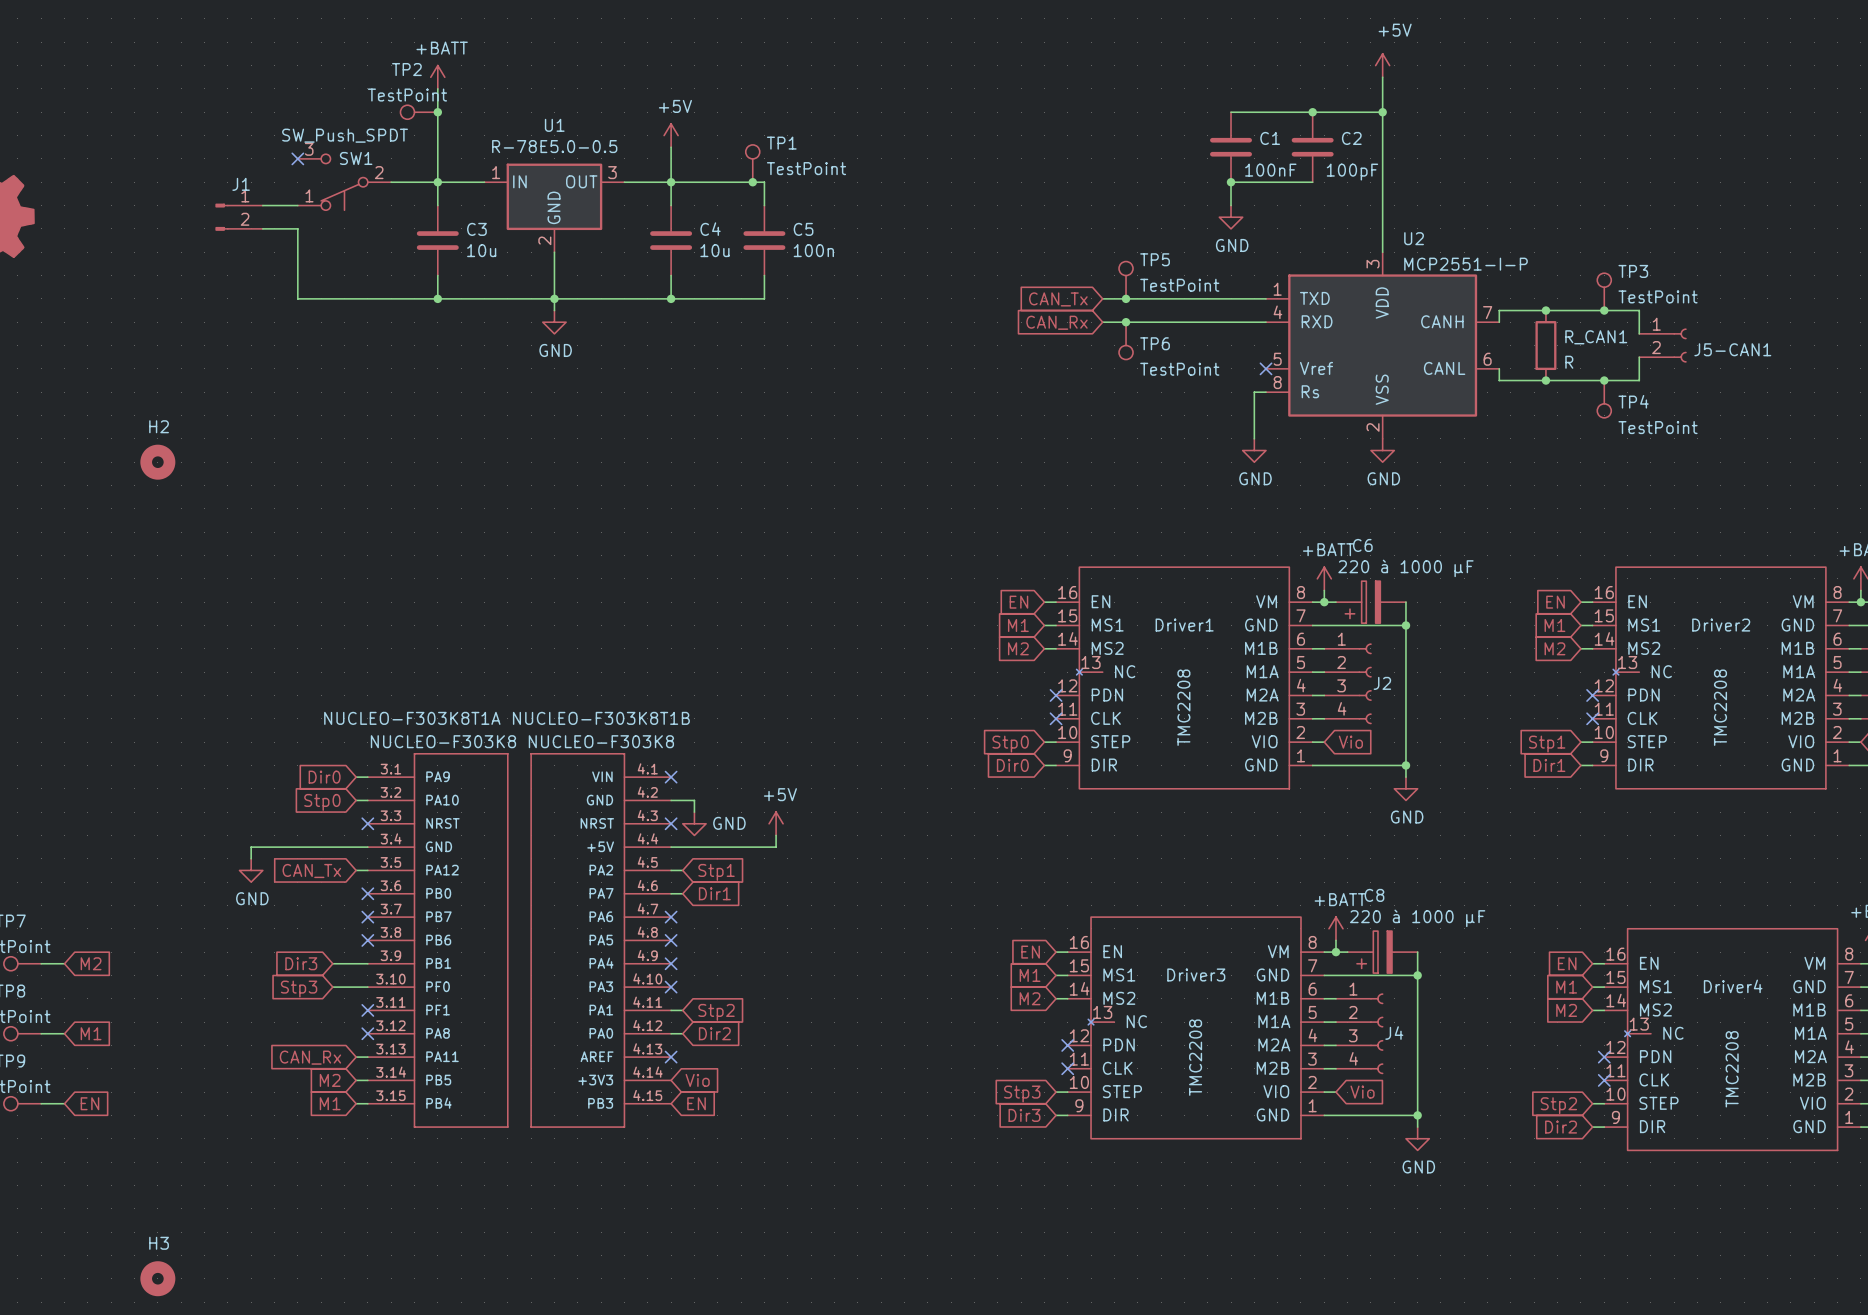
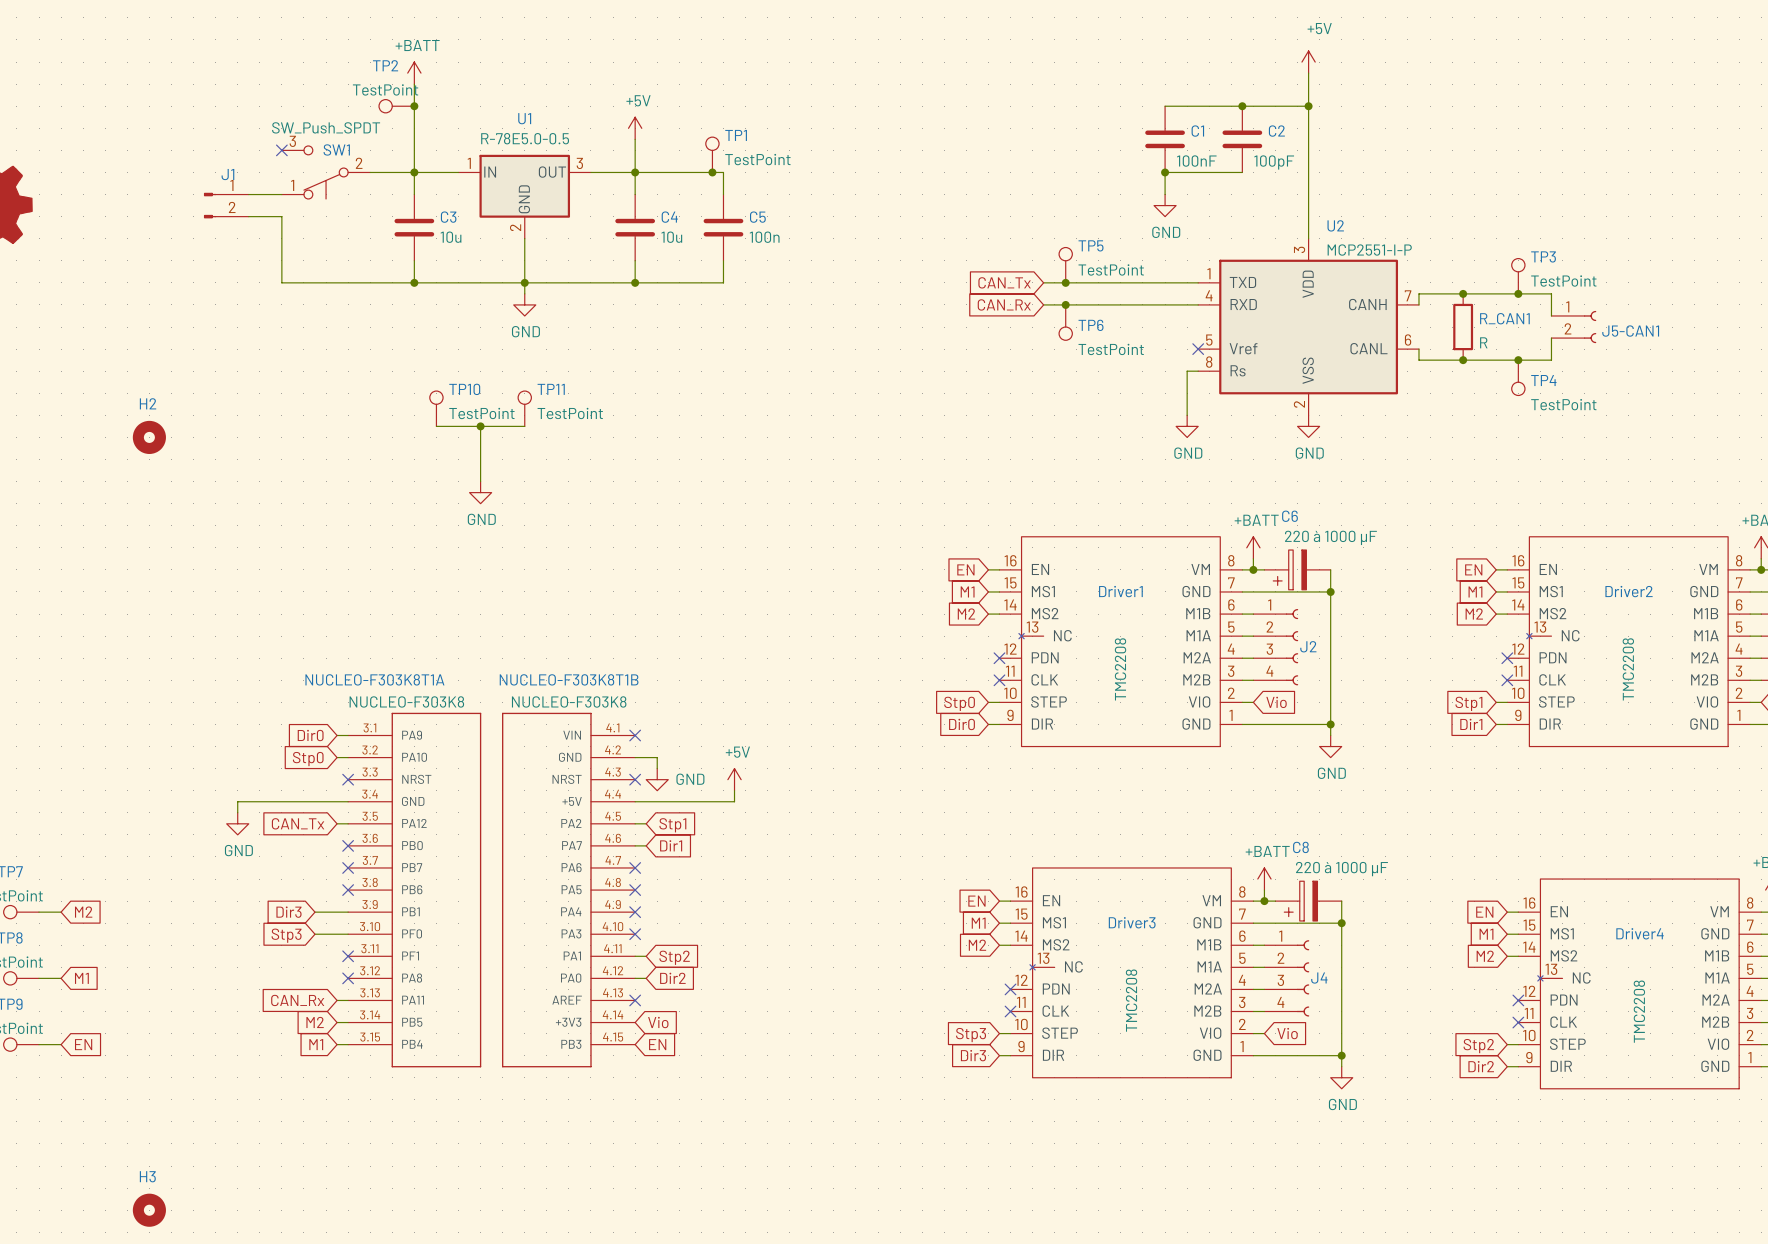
TP10: none -> TestPoint (436, 408)
TP11: none -> TestPoint (524, 408)
wire: none -> (436, 426) (524, 426)
wire: none -> (480, 426) (480, 481)
junction: none -> (480, 426)
power symbol: none -> GND (480, 492)

